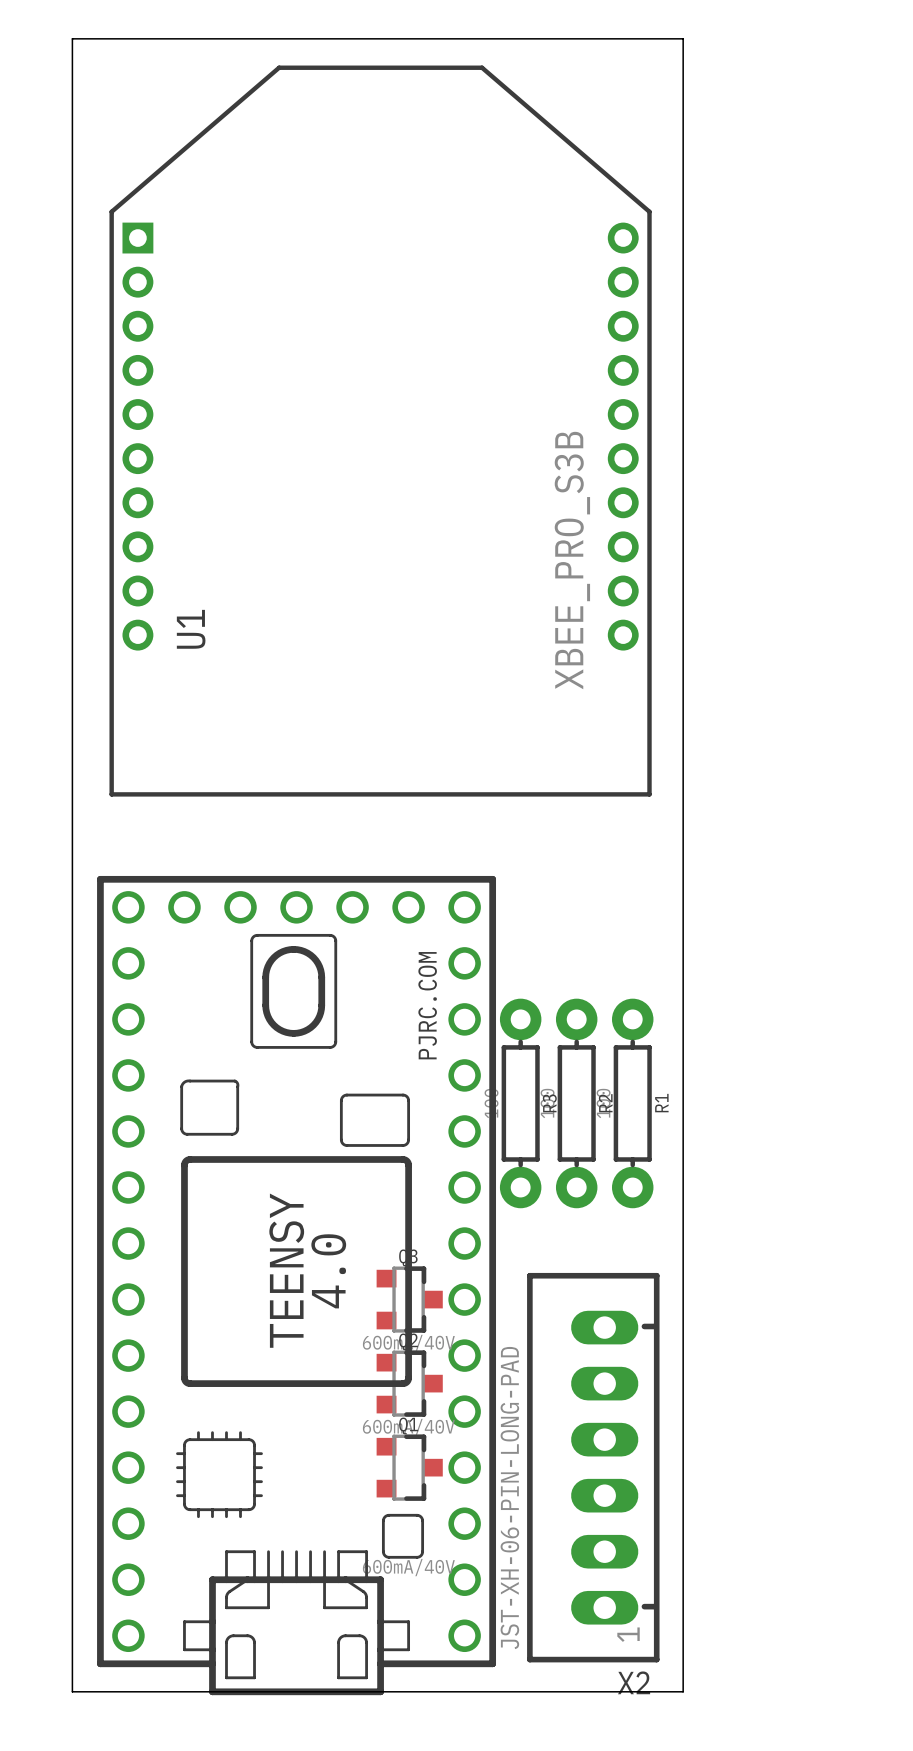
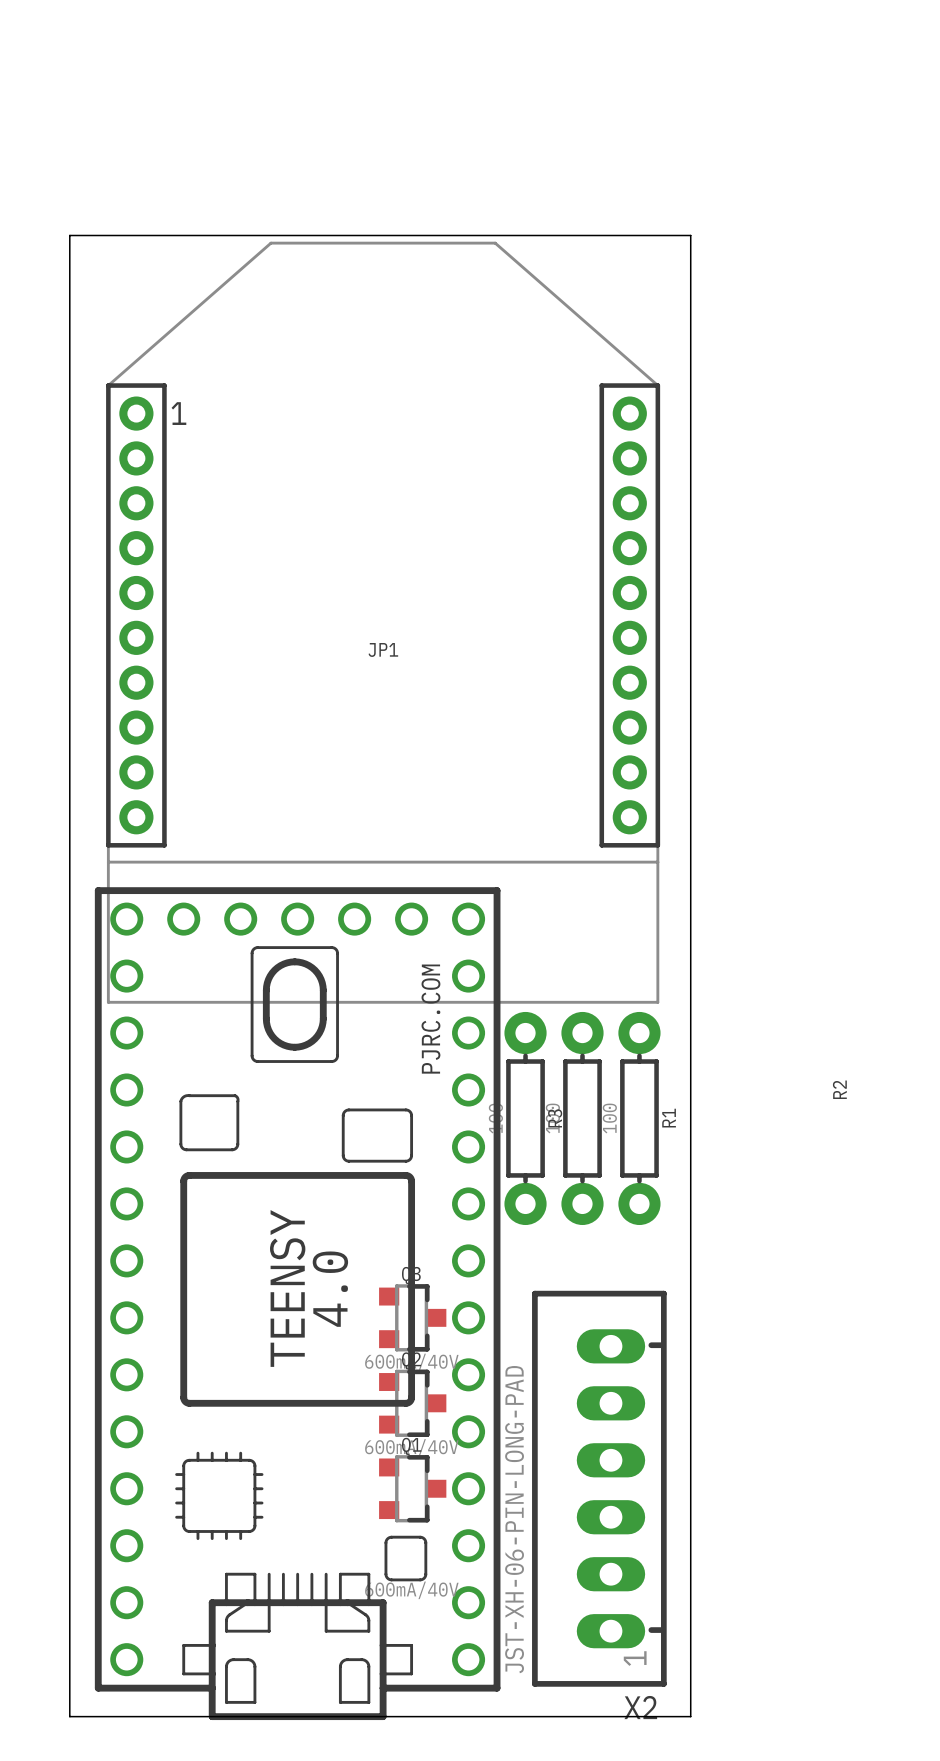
board edge: (72, 234) (72, 38) (683, 38) (683, 234) -> (69, 235) (690, 235)
U1: XBEE_PRO_S3B (380, 431) -> none
JP1: none -> (383, 622)
R2 name position: R2 (605, 1103) -> R2 (839, 1089)

